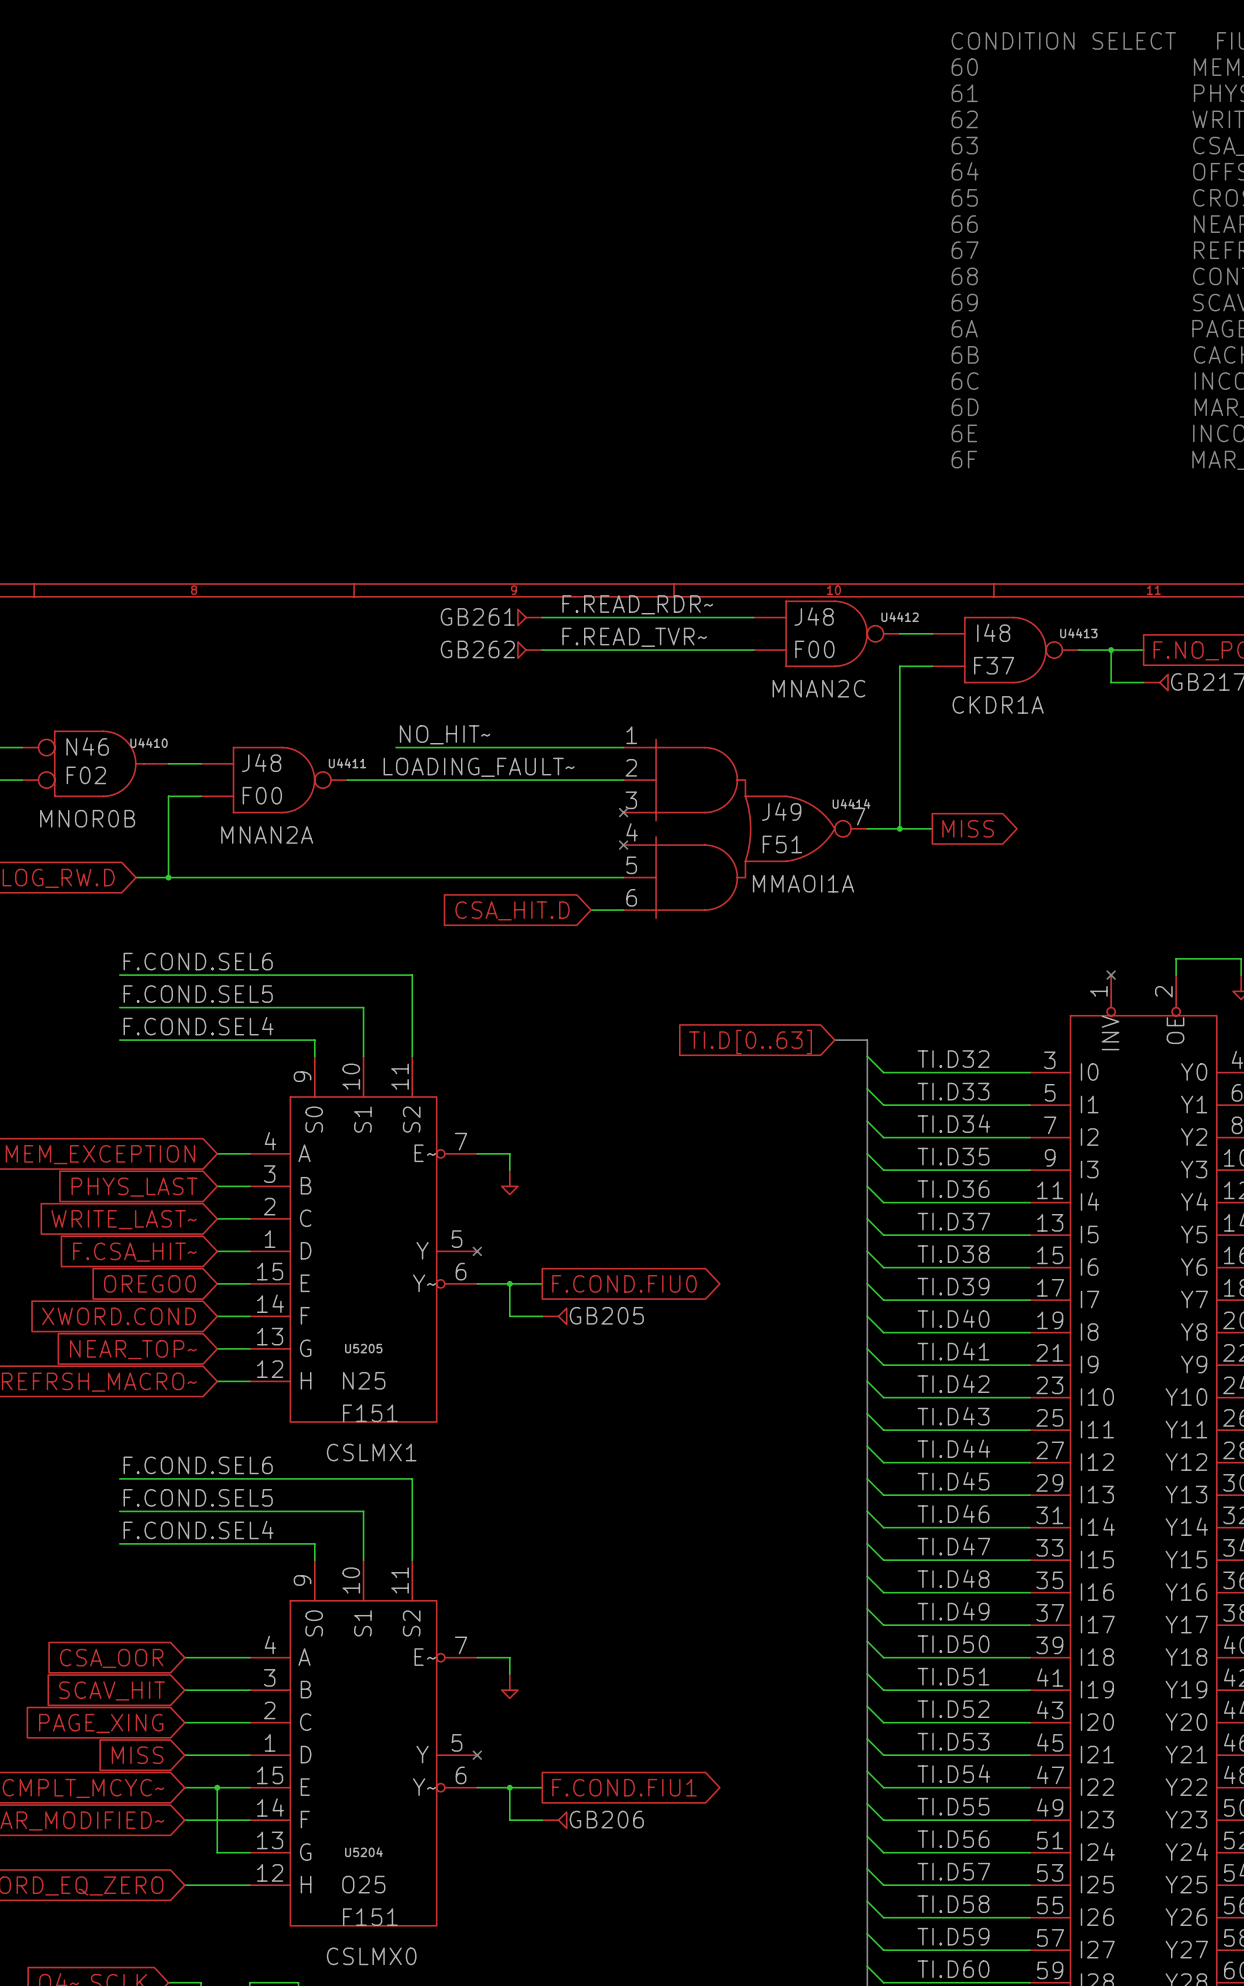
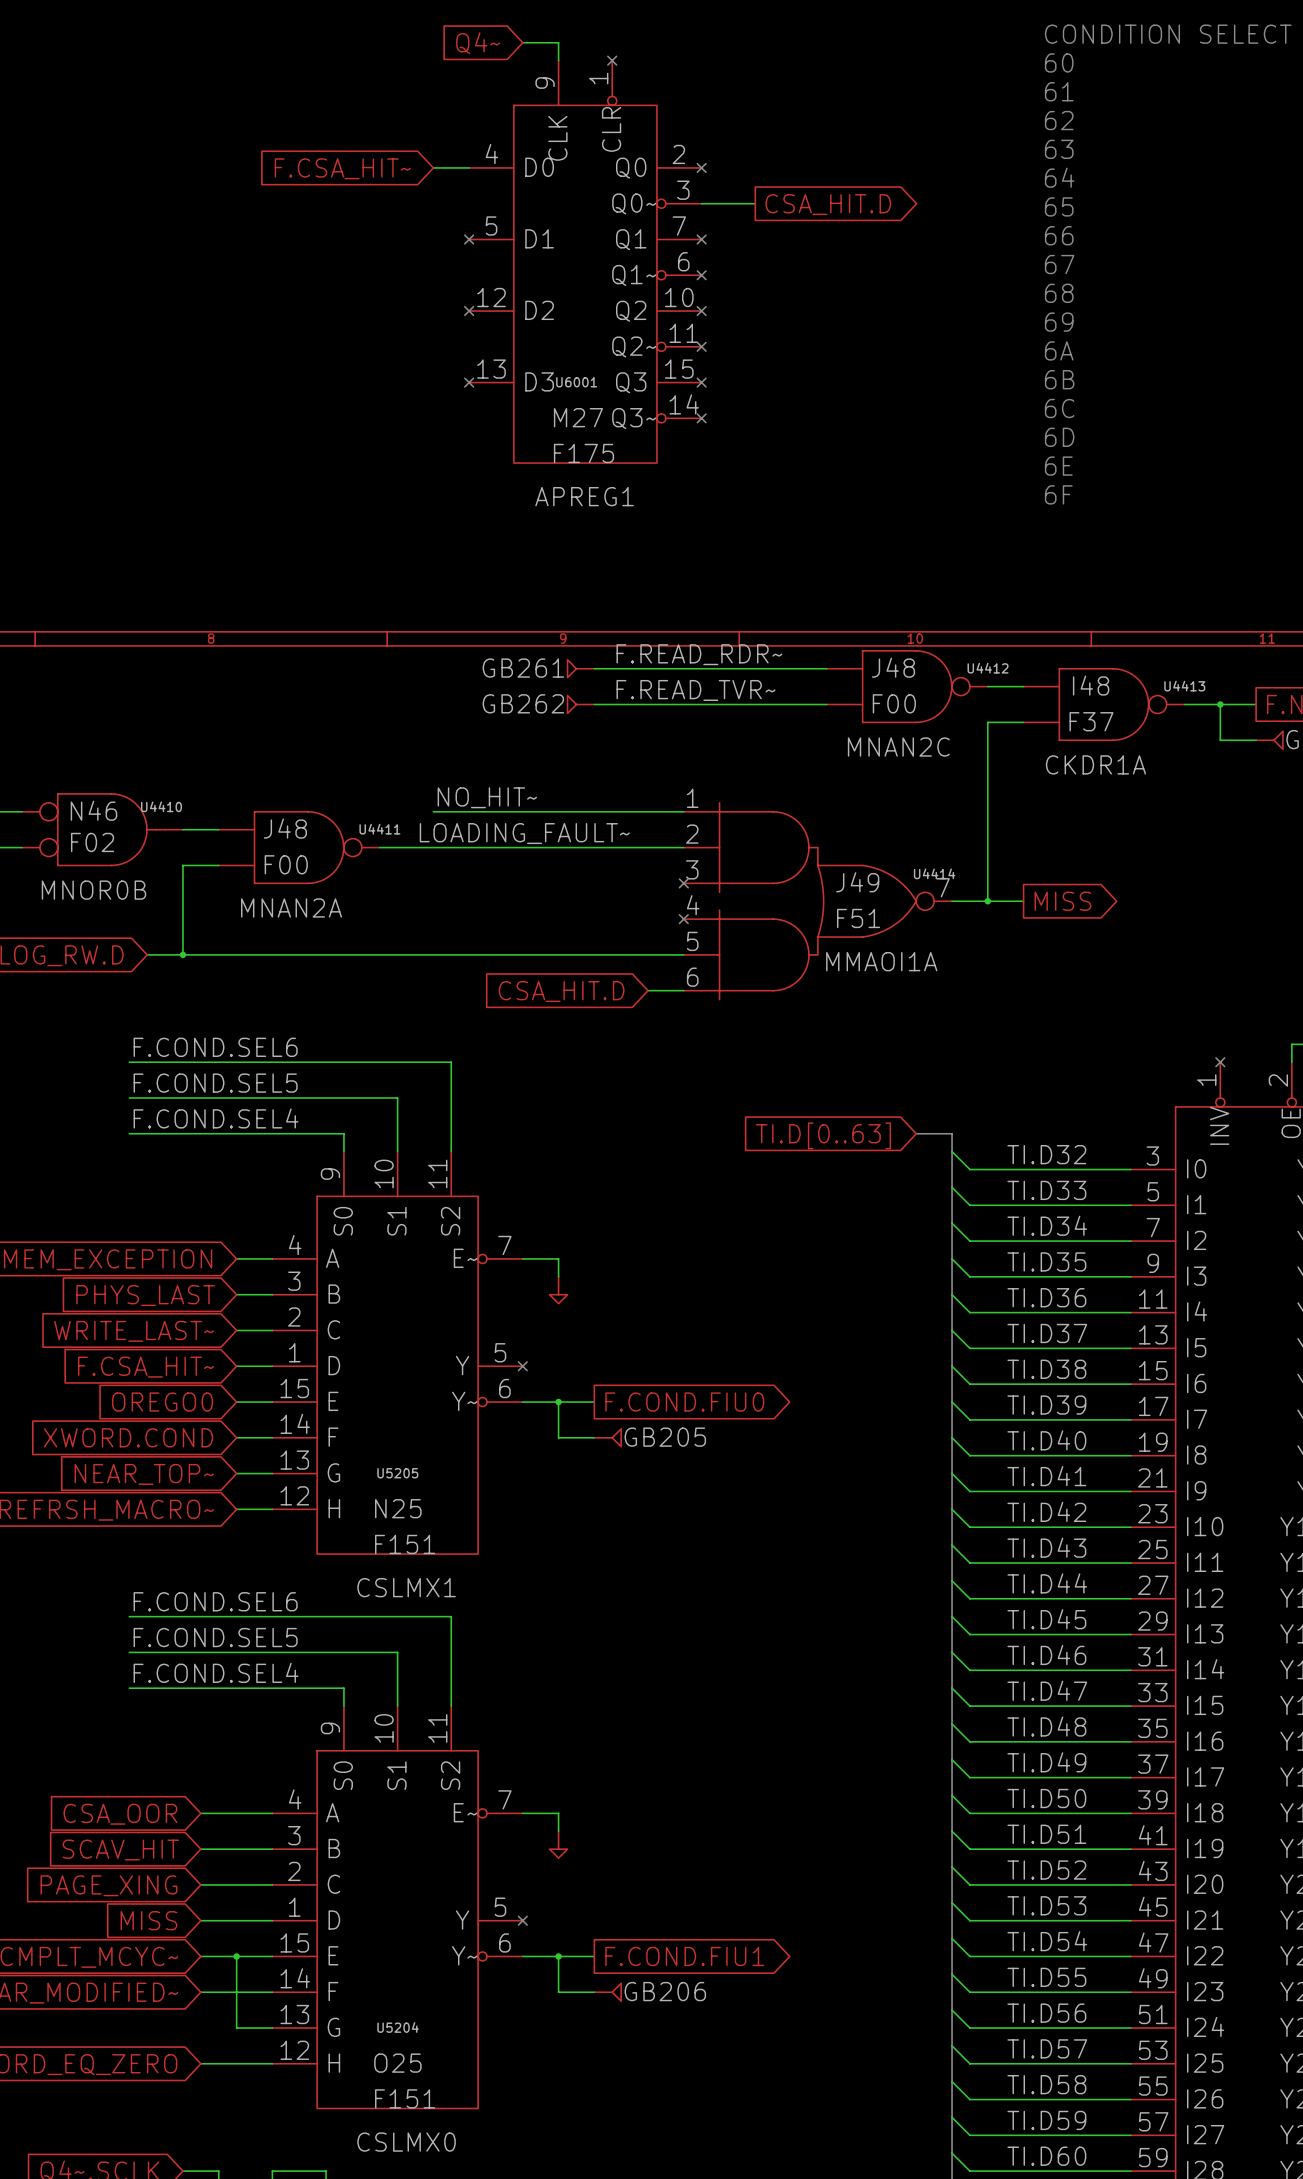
wire: none -> (522, 42) (558, 42) (558, 60)
global label: none -> Q4~ (478, 43)
no-connect mark: none -> (612, 60)
wire: none -> (433, 167) (469, 167)
no-connect mark: none -> (701, 167)
global label: none -> F.CSA_HIT~ (342, 168)
wire: none -> (701, 203) (755, 203)
global label: none -> CSA_HIT.D (828, 204)
no-connect mark: none -> (469, 239)
no-connect mark: none -> (701, 239)
U6001: none -> F175 (585, 261)
no-connect mark: none -> (701, 275)
no-connect mark: none -> (469, 311)
no-connect mark: none -> (701, 311)
no-connect mark: none -> (701, 346)
no-connect mark: none -> (469, 382)
no-connect mark: none -> (701, 382)
no-connect mark: none -> (701, 418)

